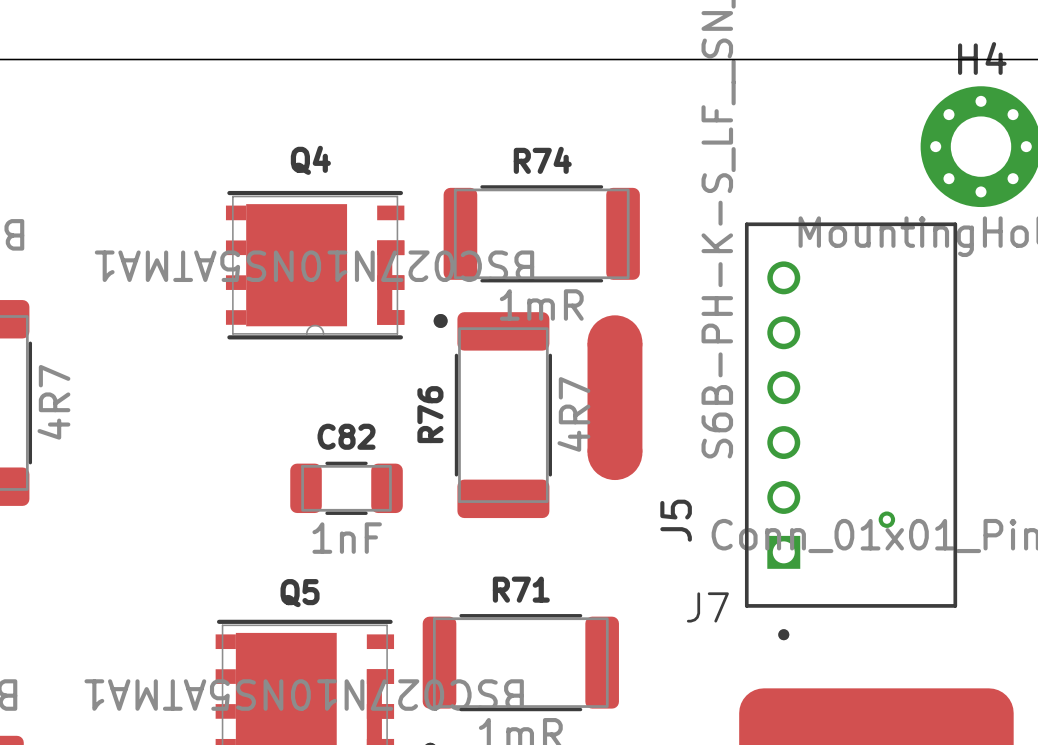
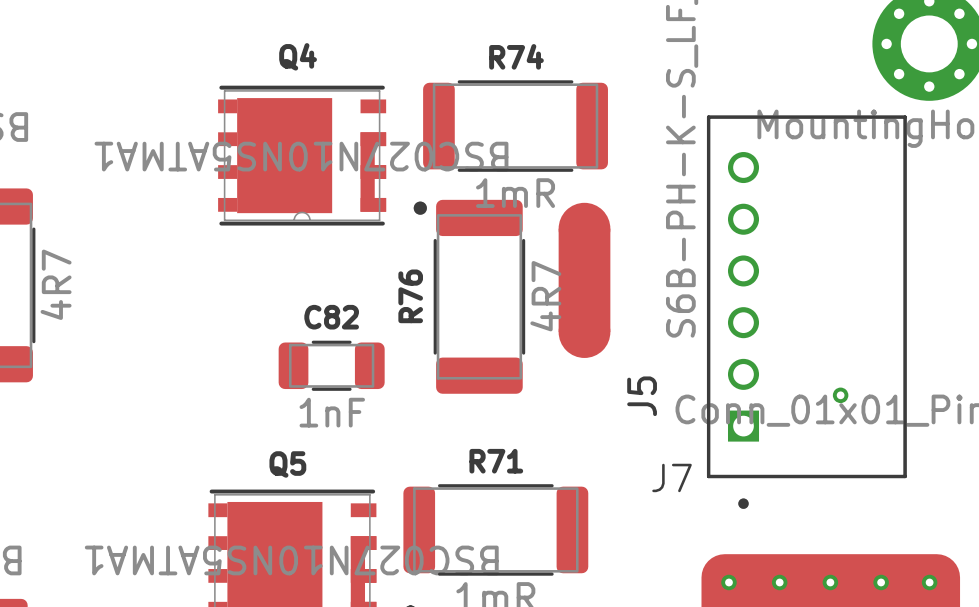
via: none -> (728, 582)
via: none -> (779, 582)
via: none -> (830, 582)
via: none -> (881, 582)
via: none -> (929, 582)

